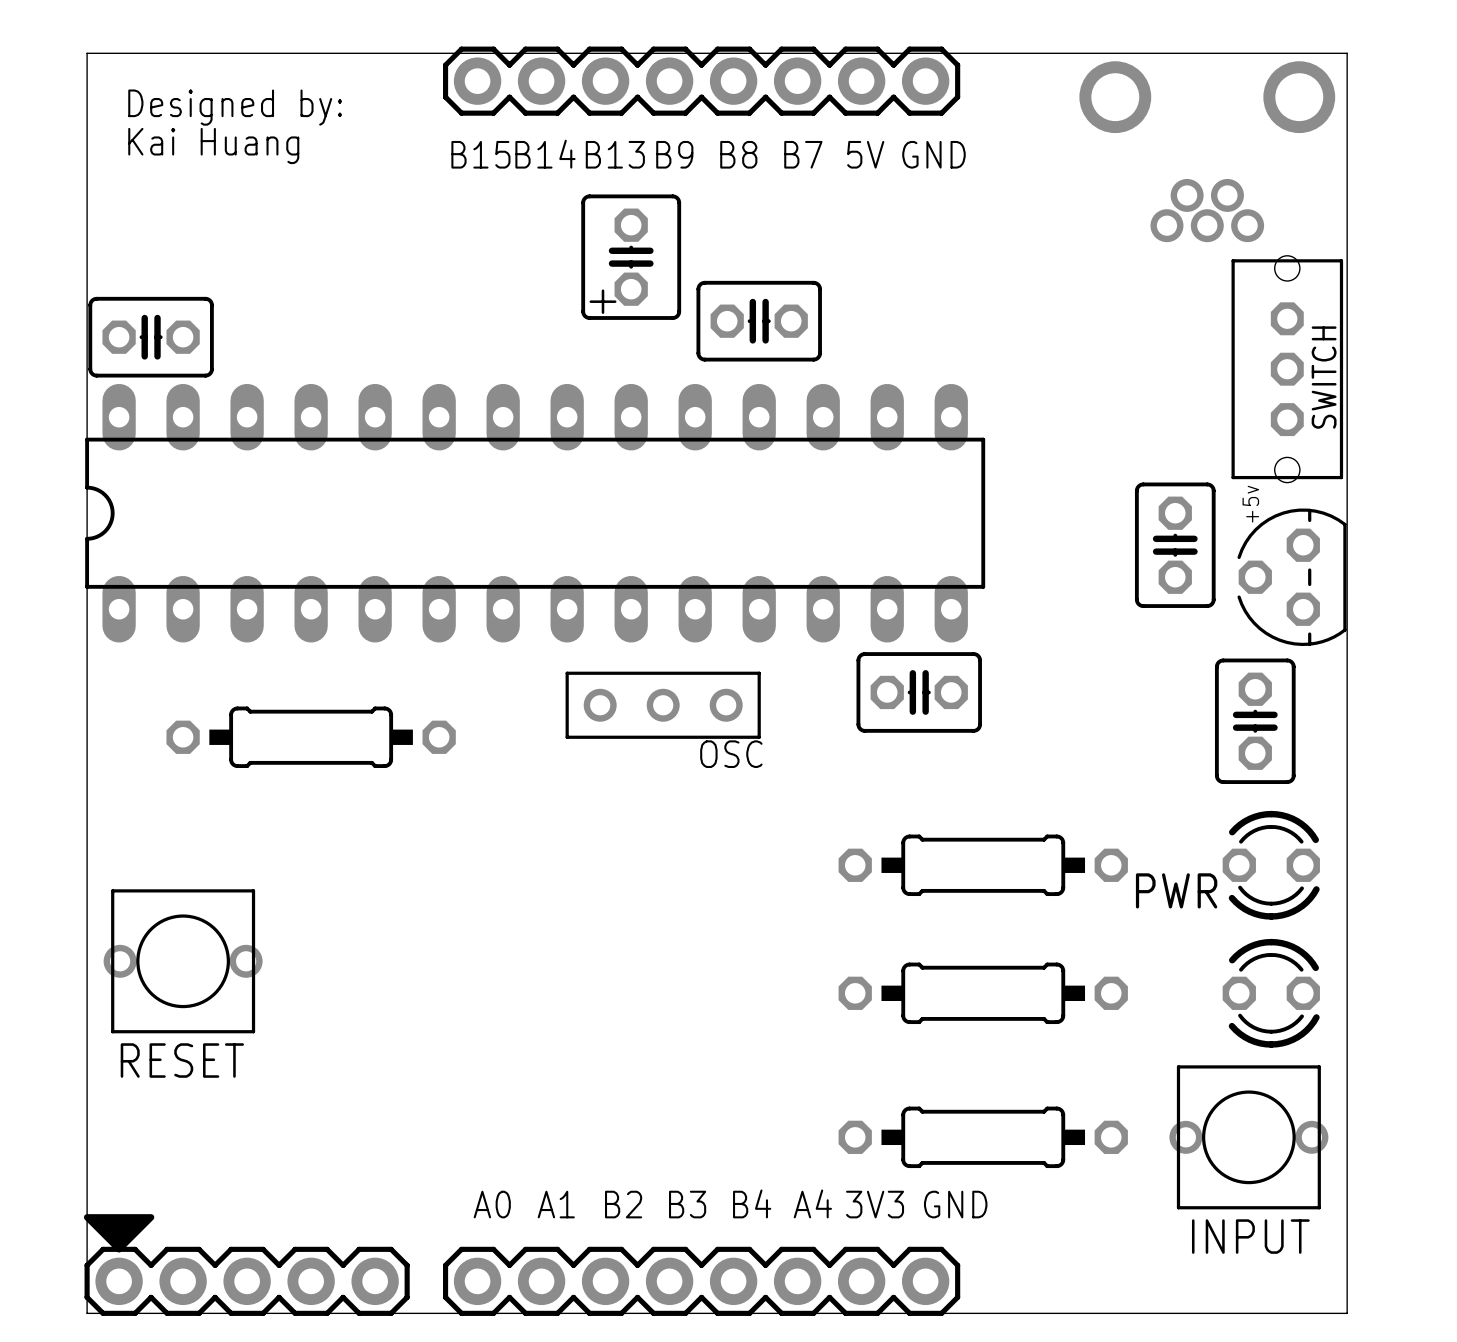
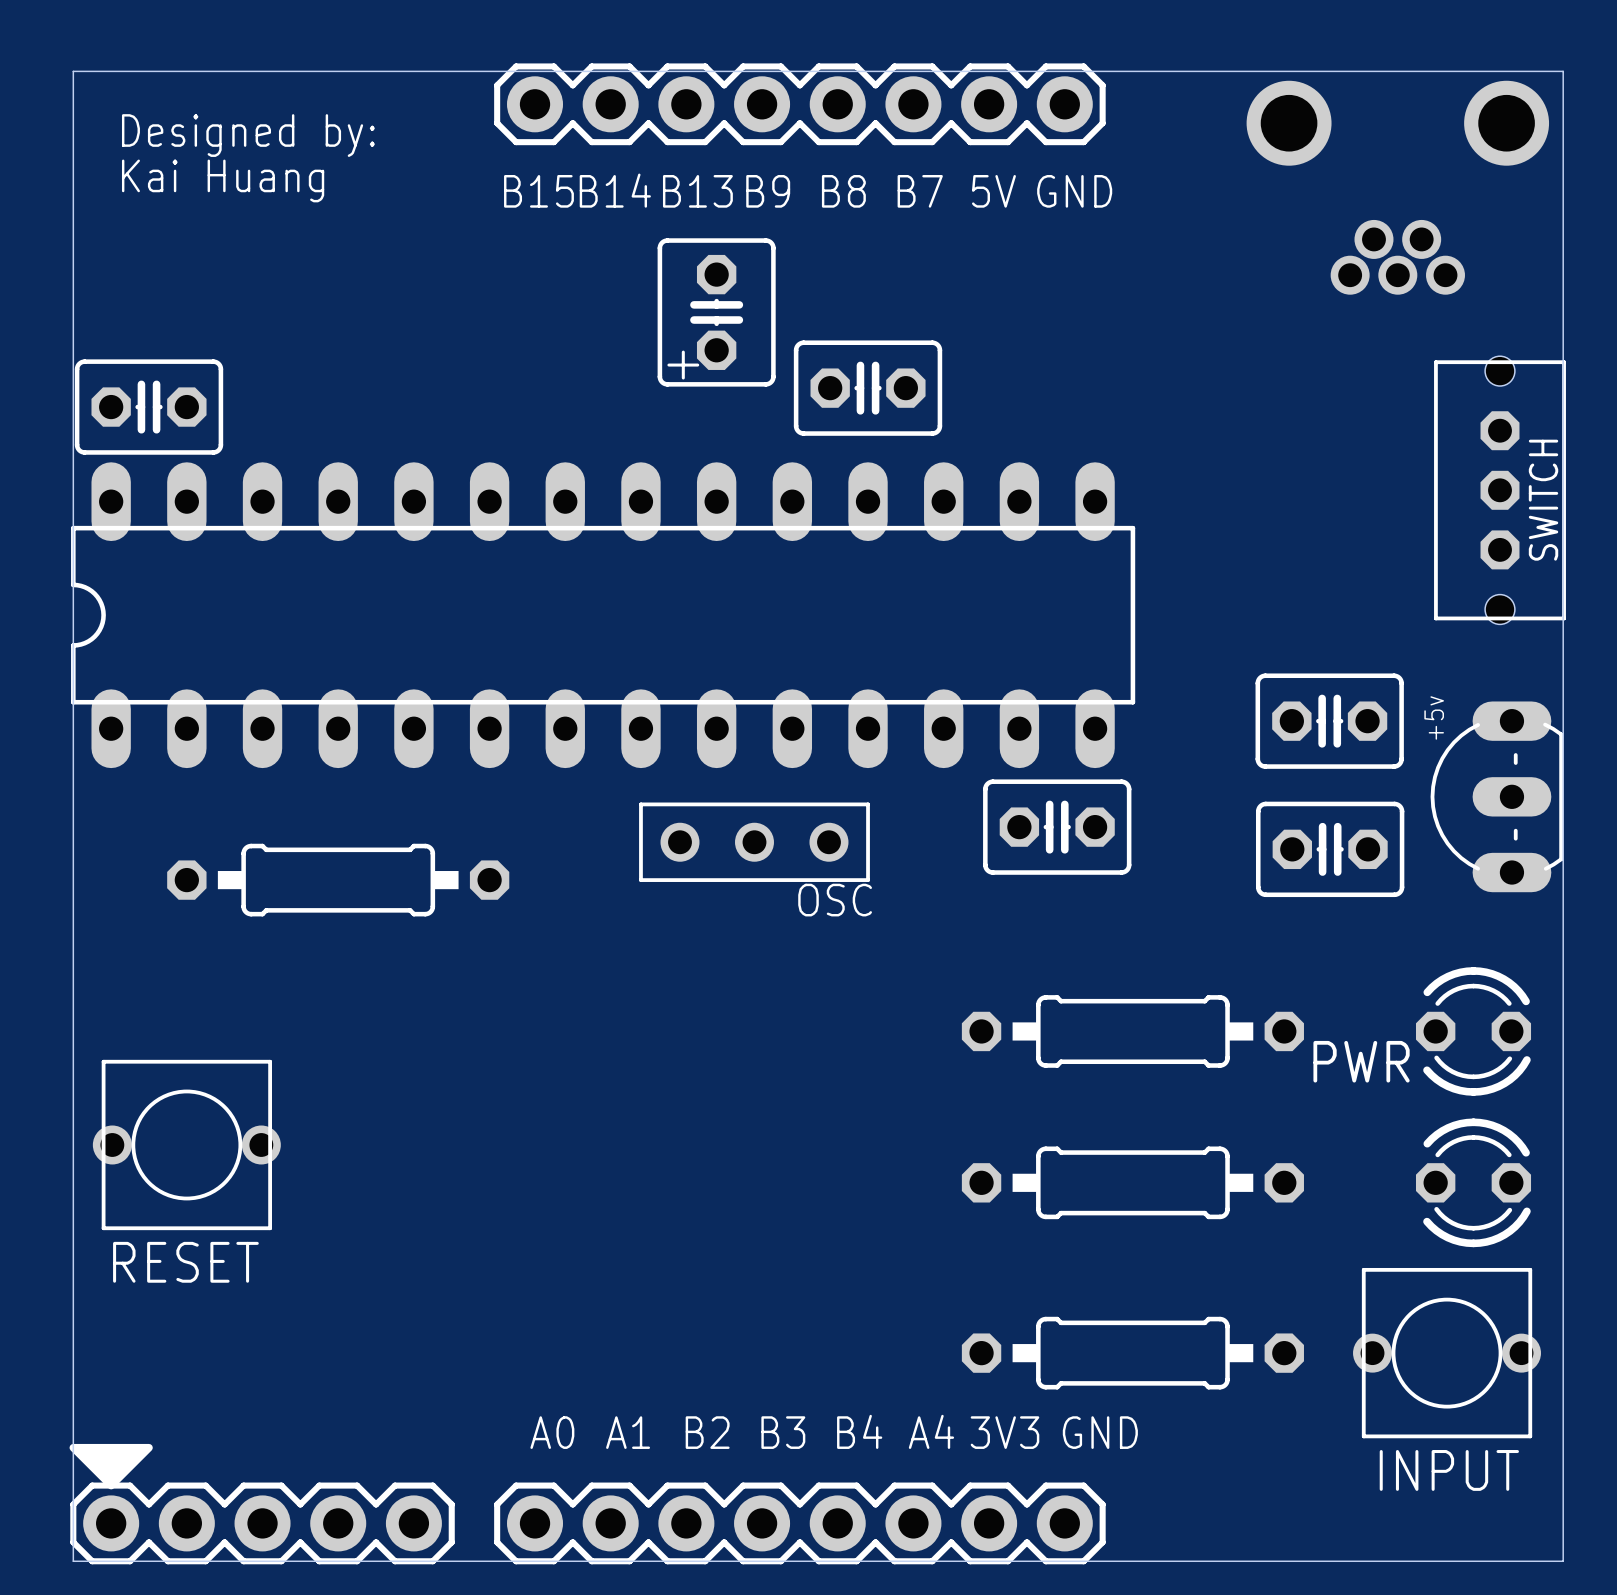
SWITCH position: (1287, 369) -> (1500, 490)
text position: +5v (1250, 504) -> +5v (1434, 717)
part rotation: 0° (1175, 545) -> 90° clockwise (1329, 721)
part: (1291, 577) -> none
part: none -> (1496, 796)
part: none -> (1330, 849)
part: (1255, 721) -> none

